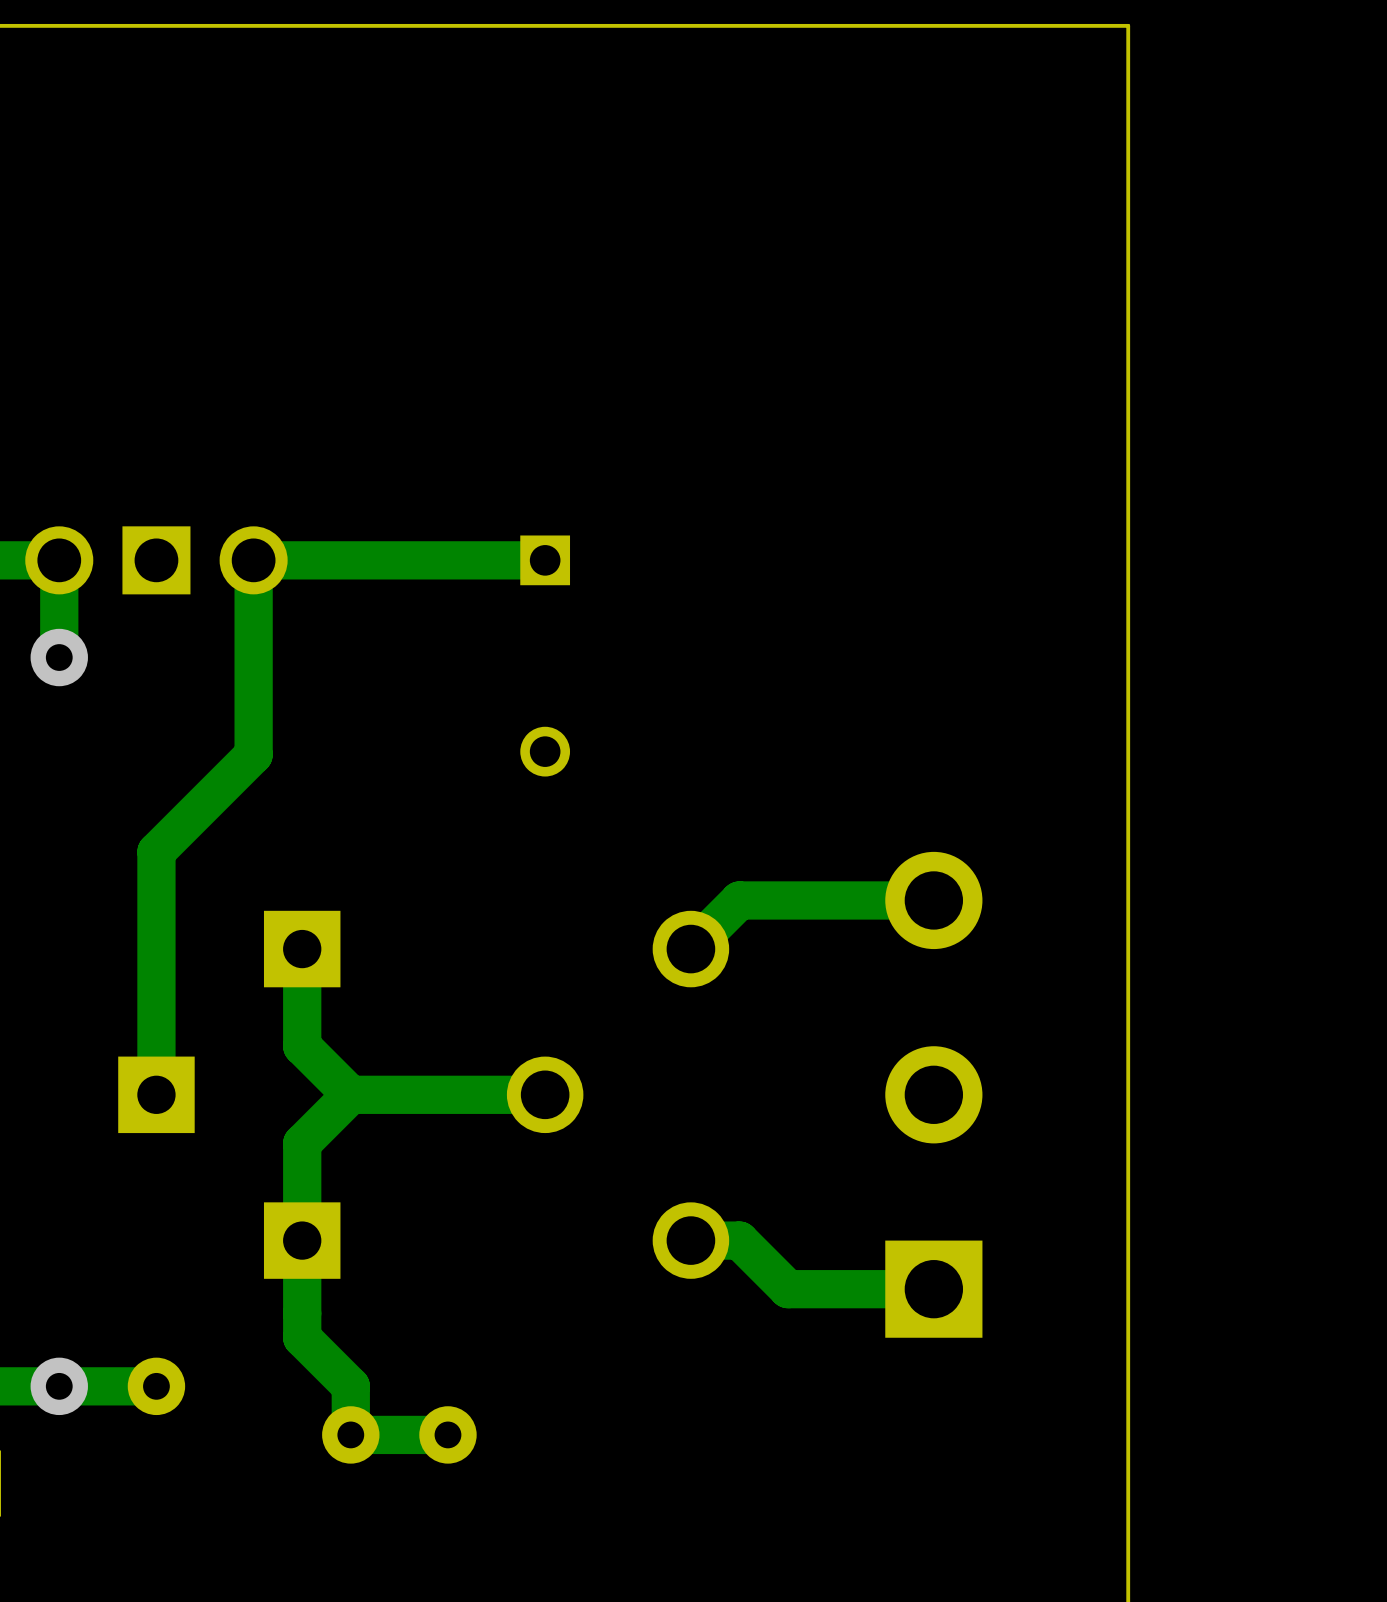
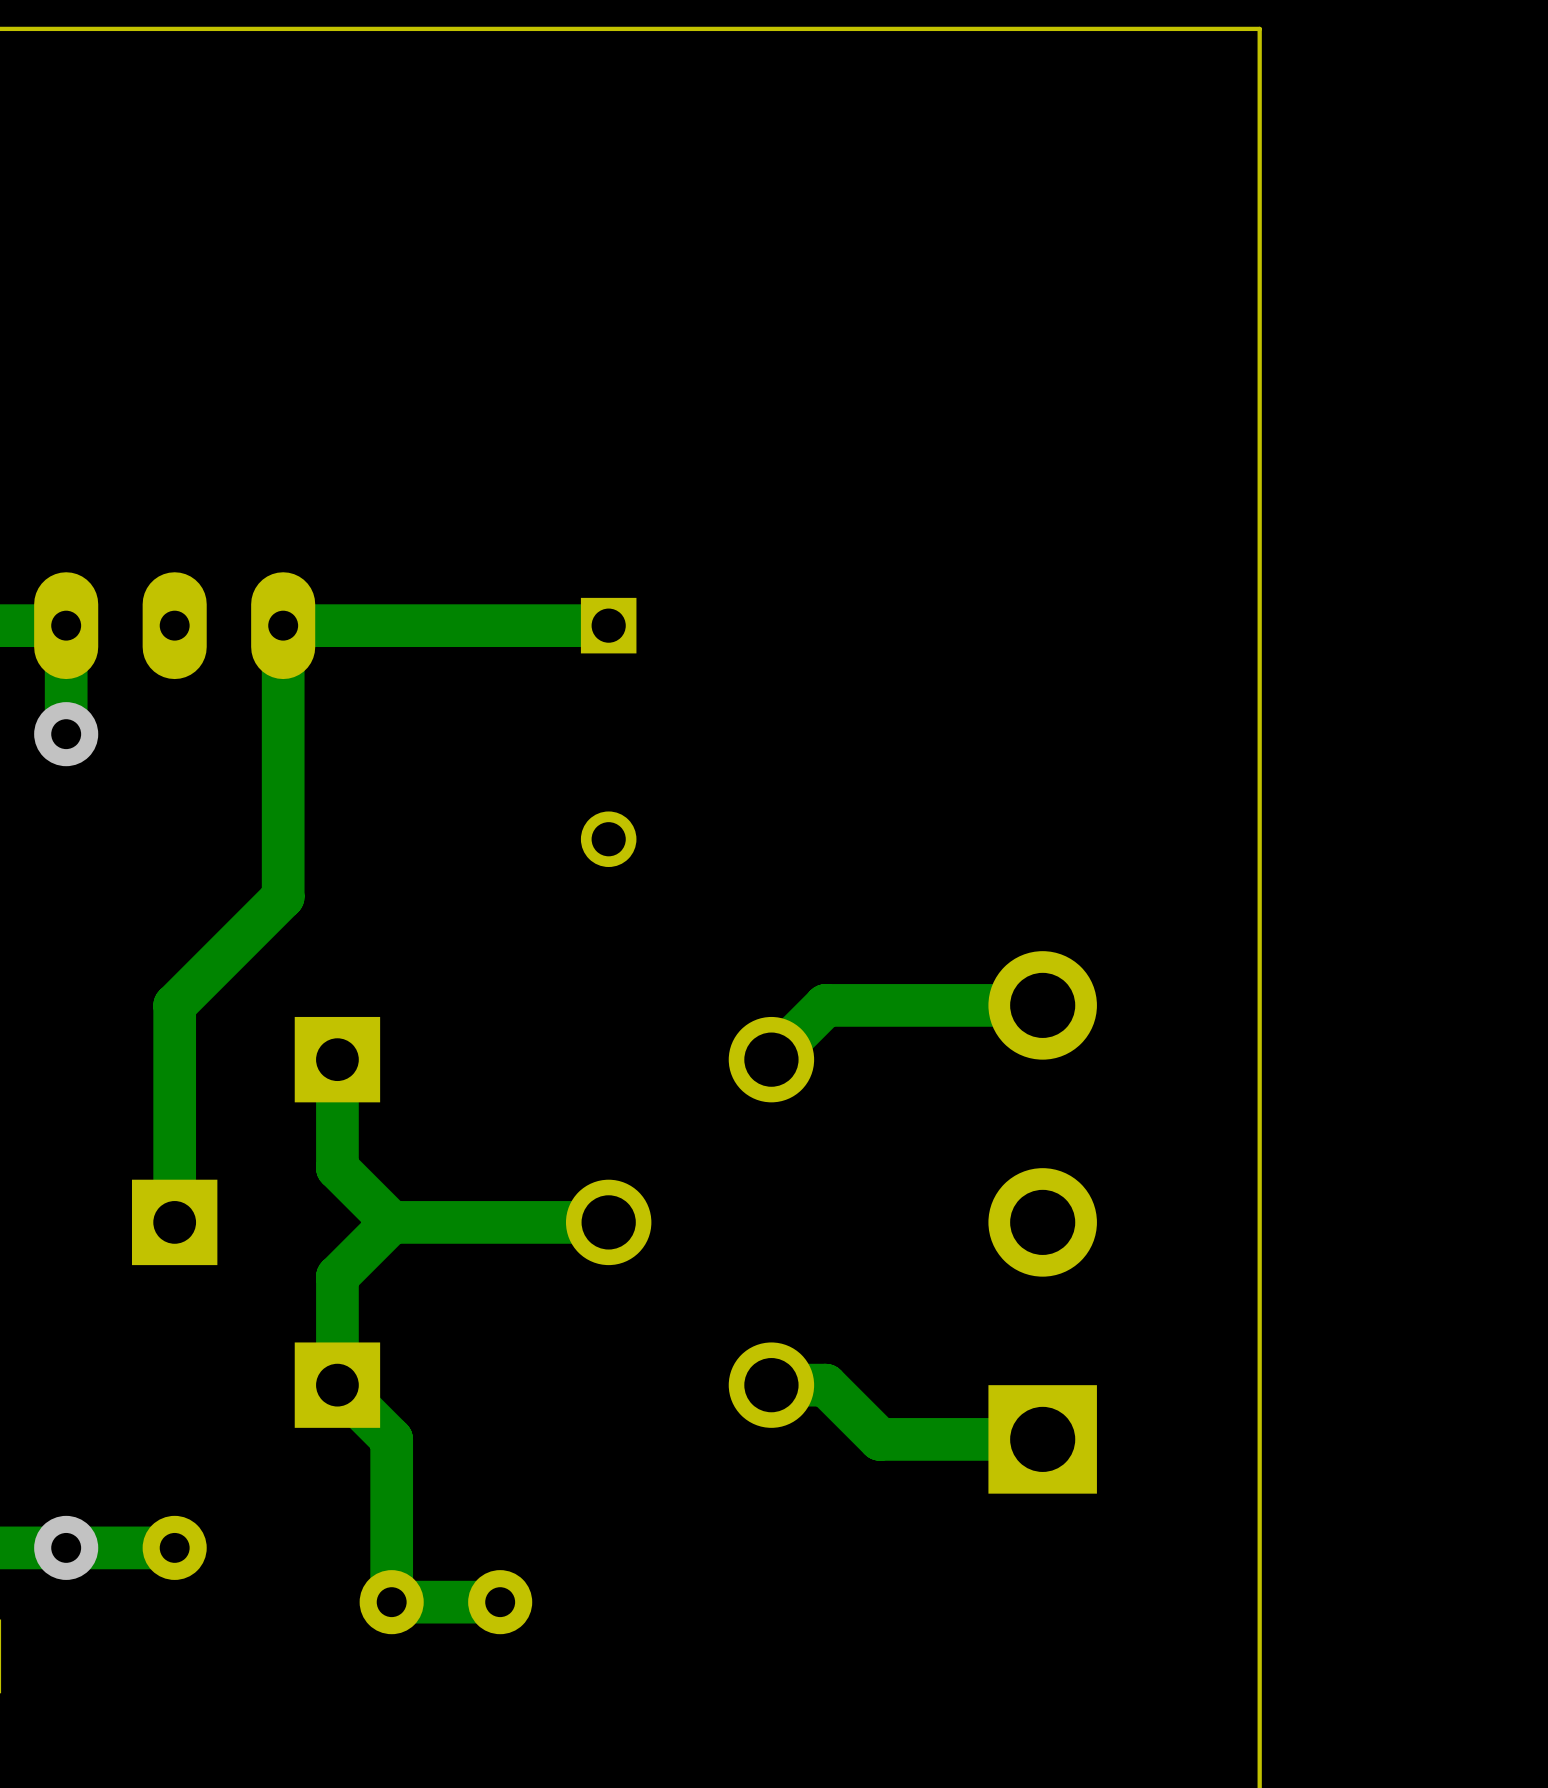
part footprint: [25, 526, 288, 595] -> [34, 572, 316, 680]
track: (253, 754) (156, 851) (156, 900) -> (283, 842) (283, 896) (174, 1005)
track: (302, 1240) (302, 1337) (350, 1386) -> (337, 1385) (391, 1439) (391, 1547)

